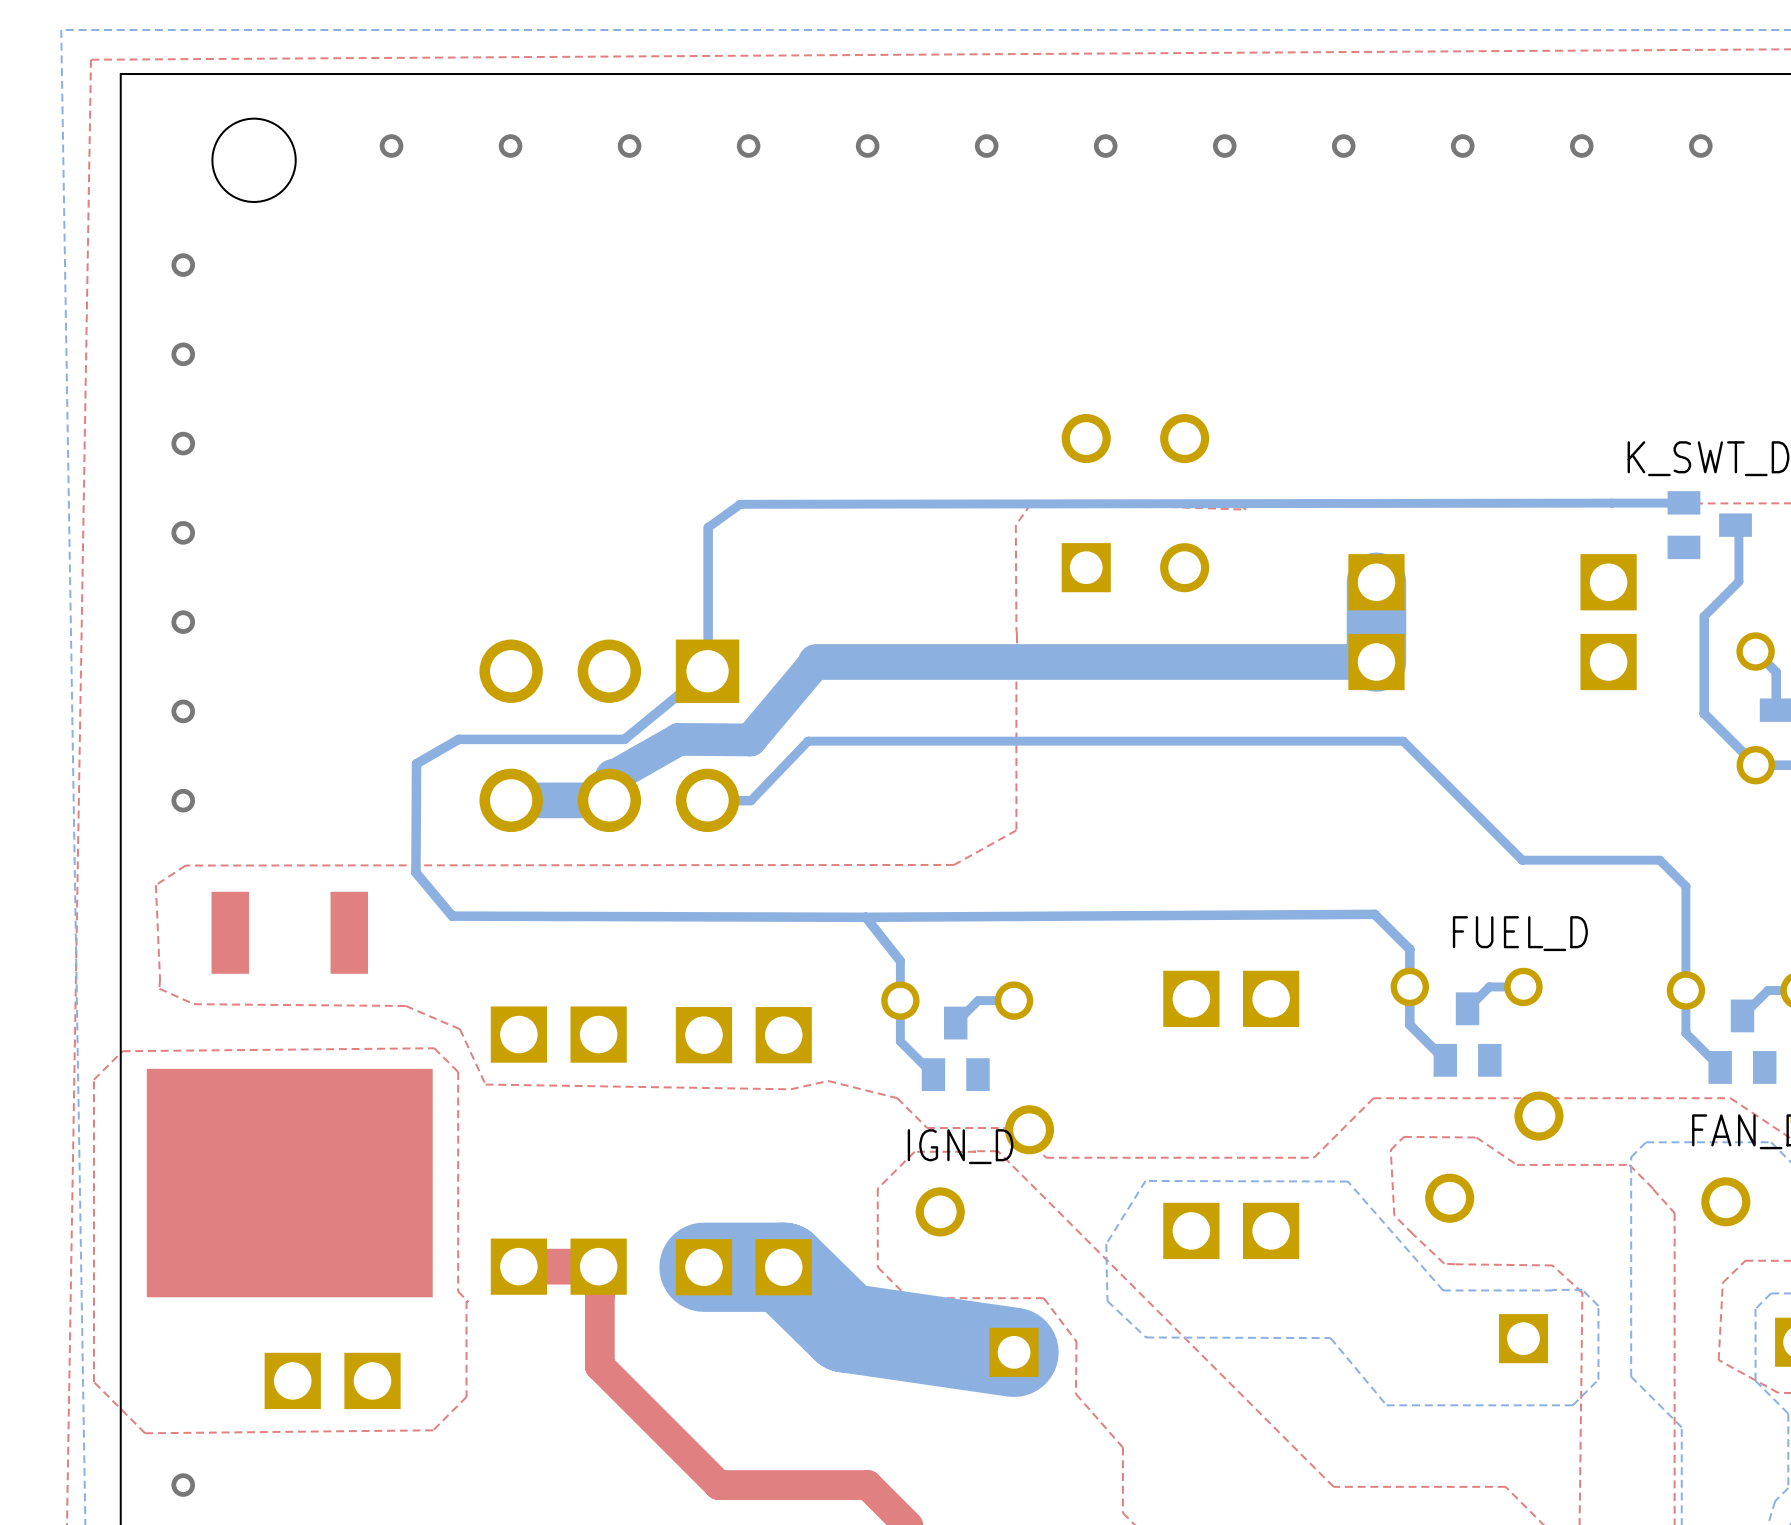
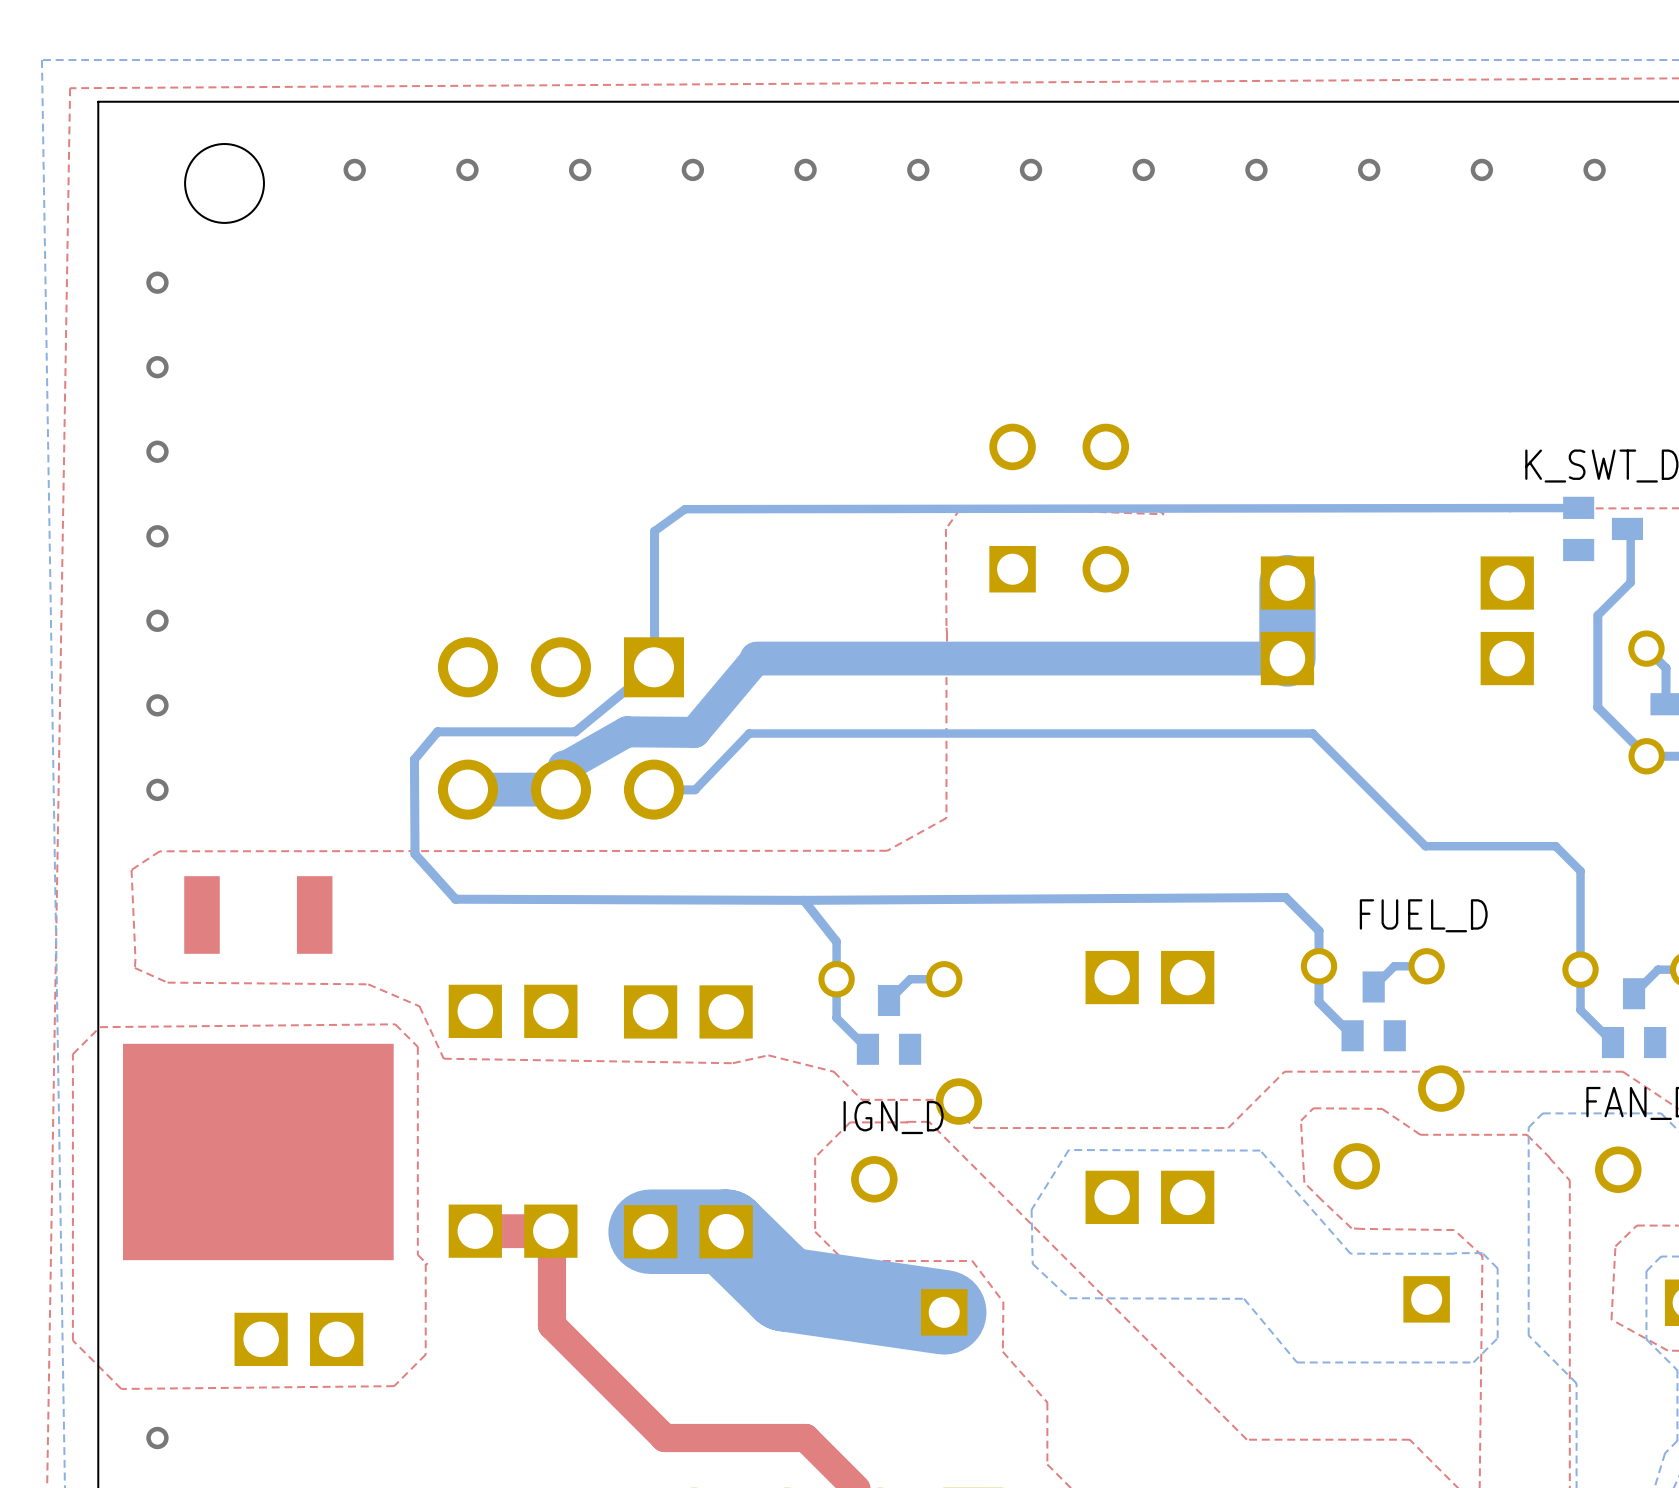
bottom track: (479, 739) (458, 739) (416, 763) (415, 872) (452, 916) (865, 917) -> (437, 731) (414, 759) (415, 854) (455, 899) (803, 900)

